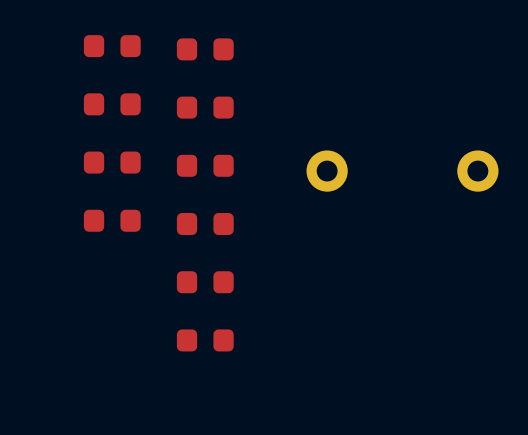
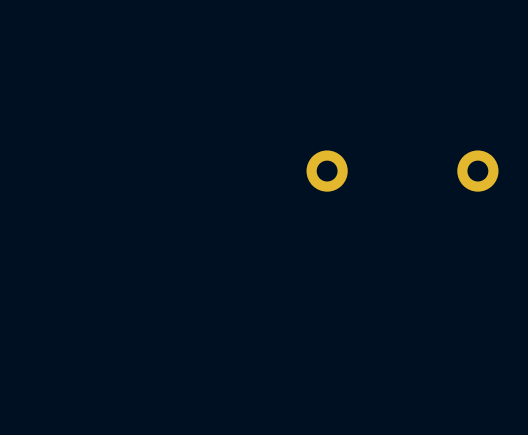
part: (112, 46) -> none
part: (205, 49) -> none
part: (112, 104) -> none
part: (205, 107) -> none
part: (112, 162) -> none
part: (205, 165) -> none
part: (112, 220) -> none
part: (205, 224) -> none
part: (205, 282) -> none
part: (205, 340) -> none

